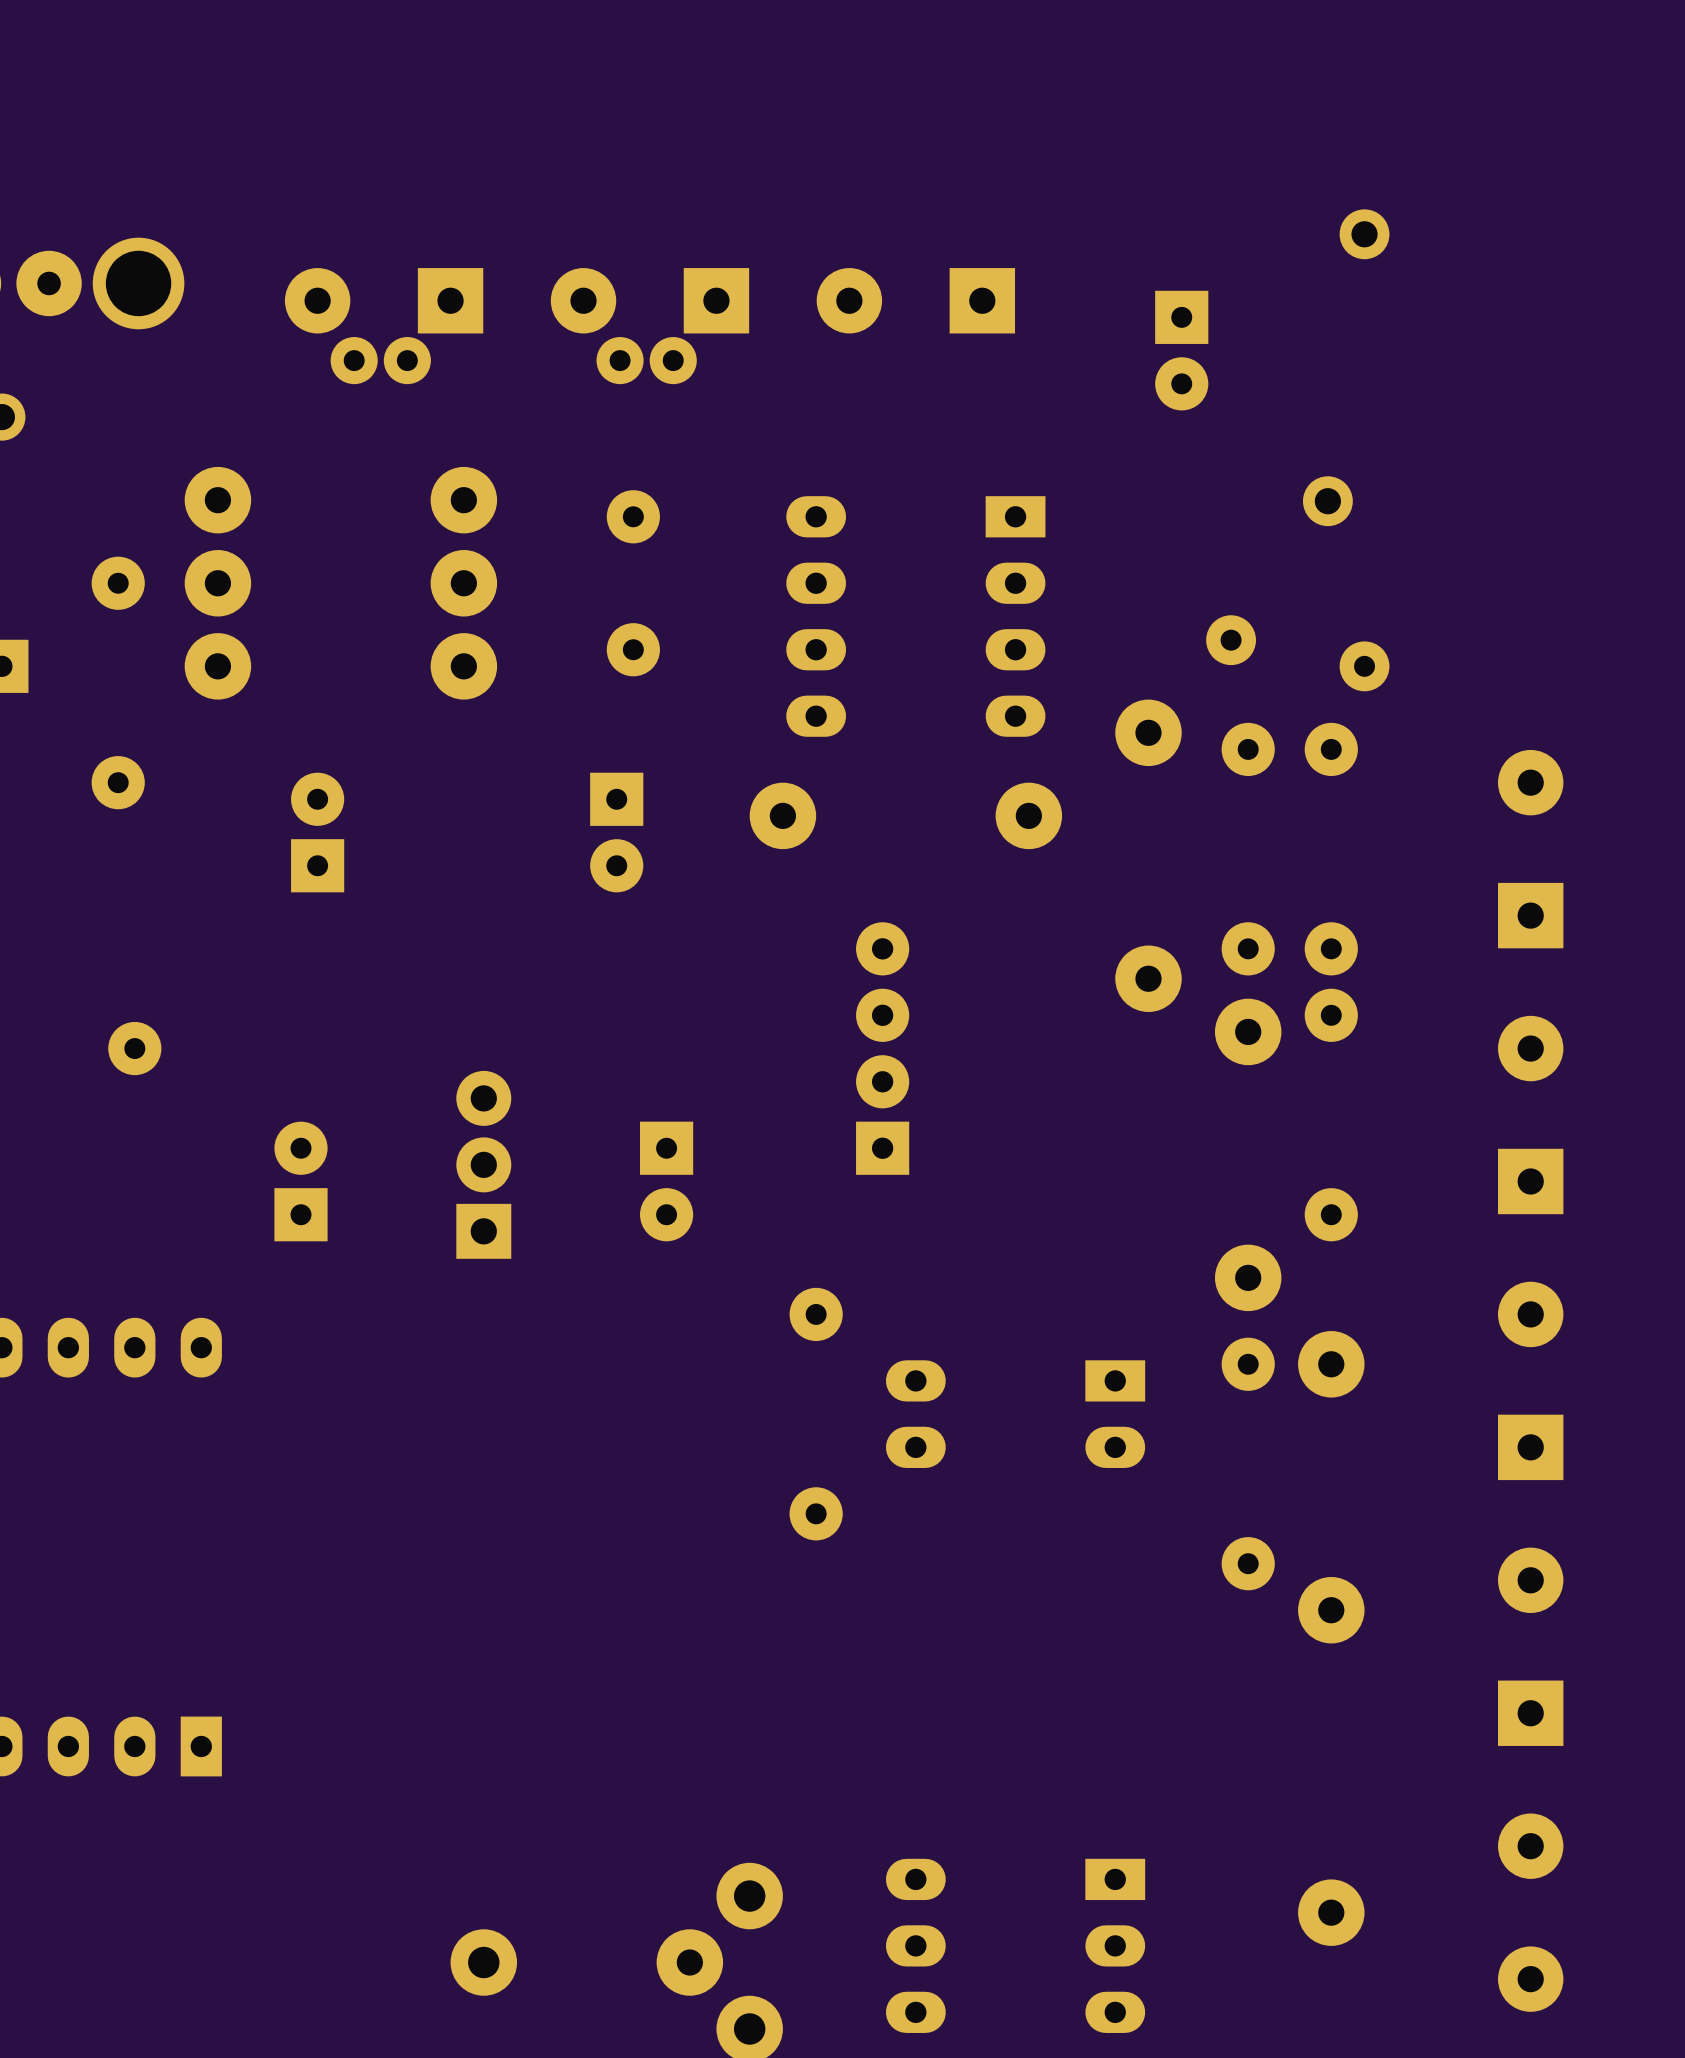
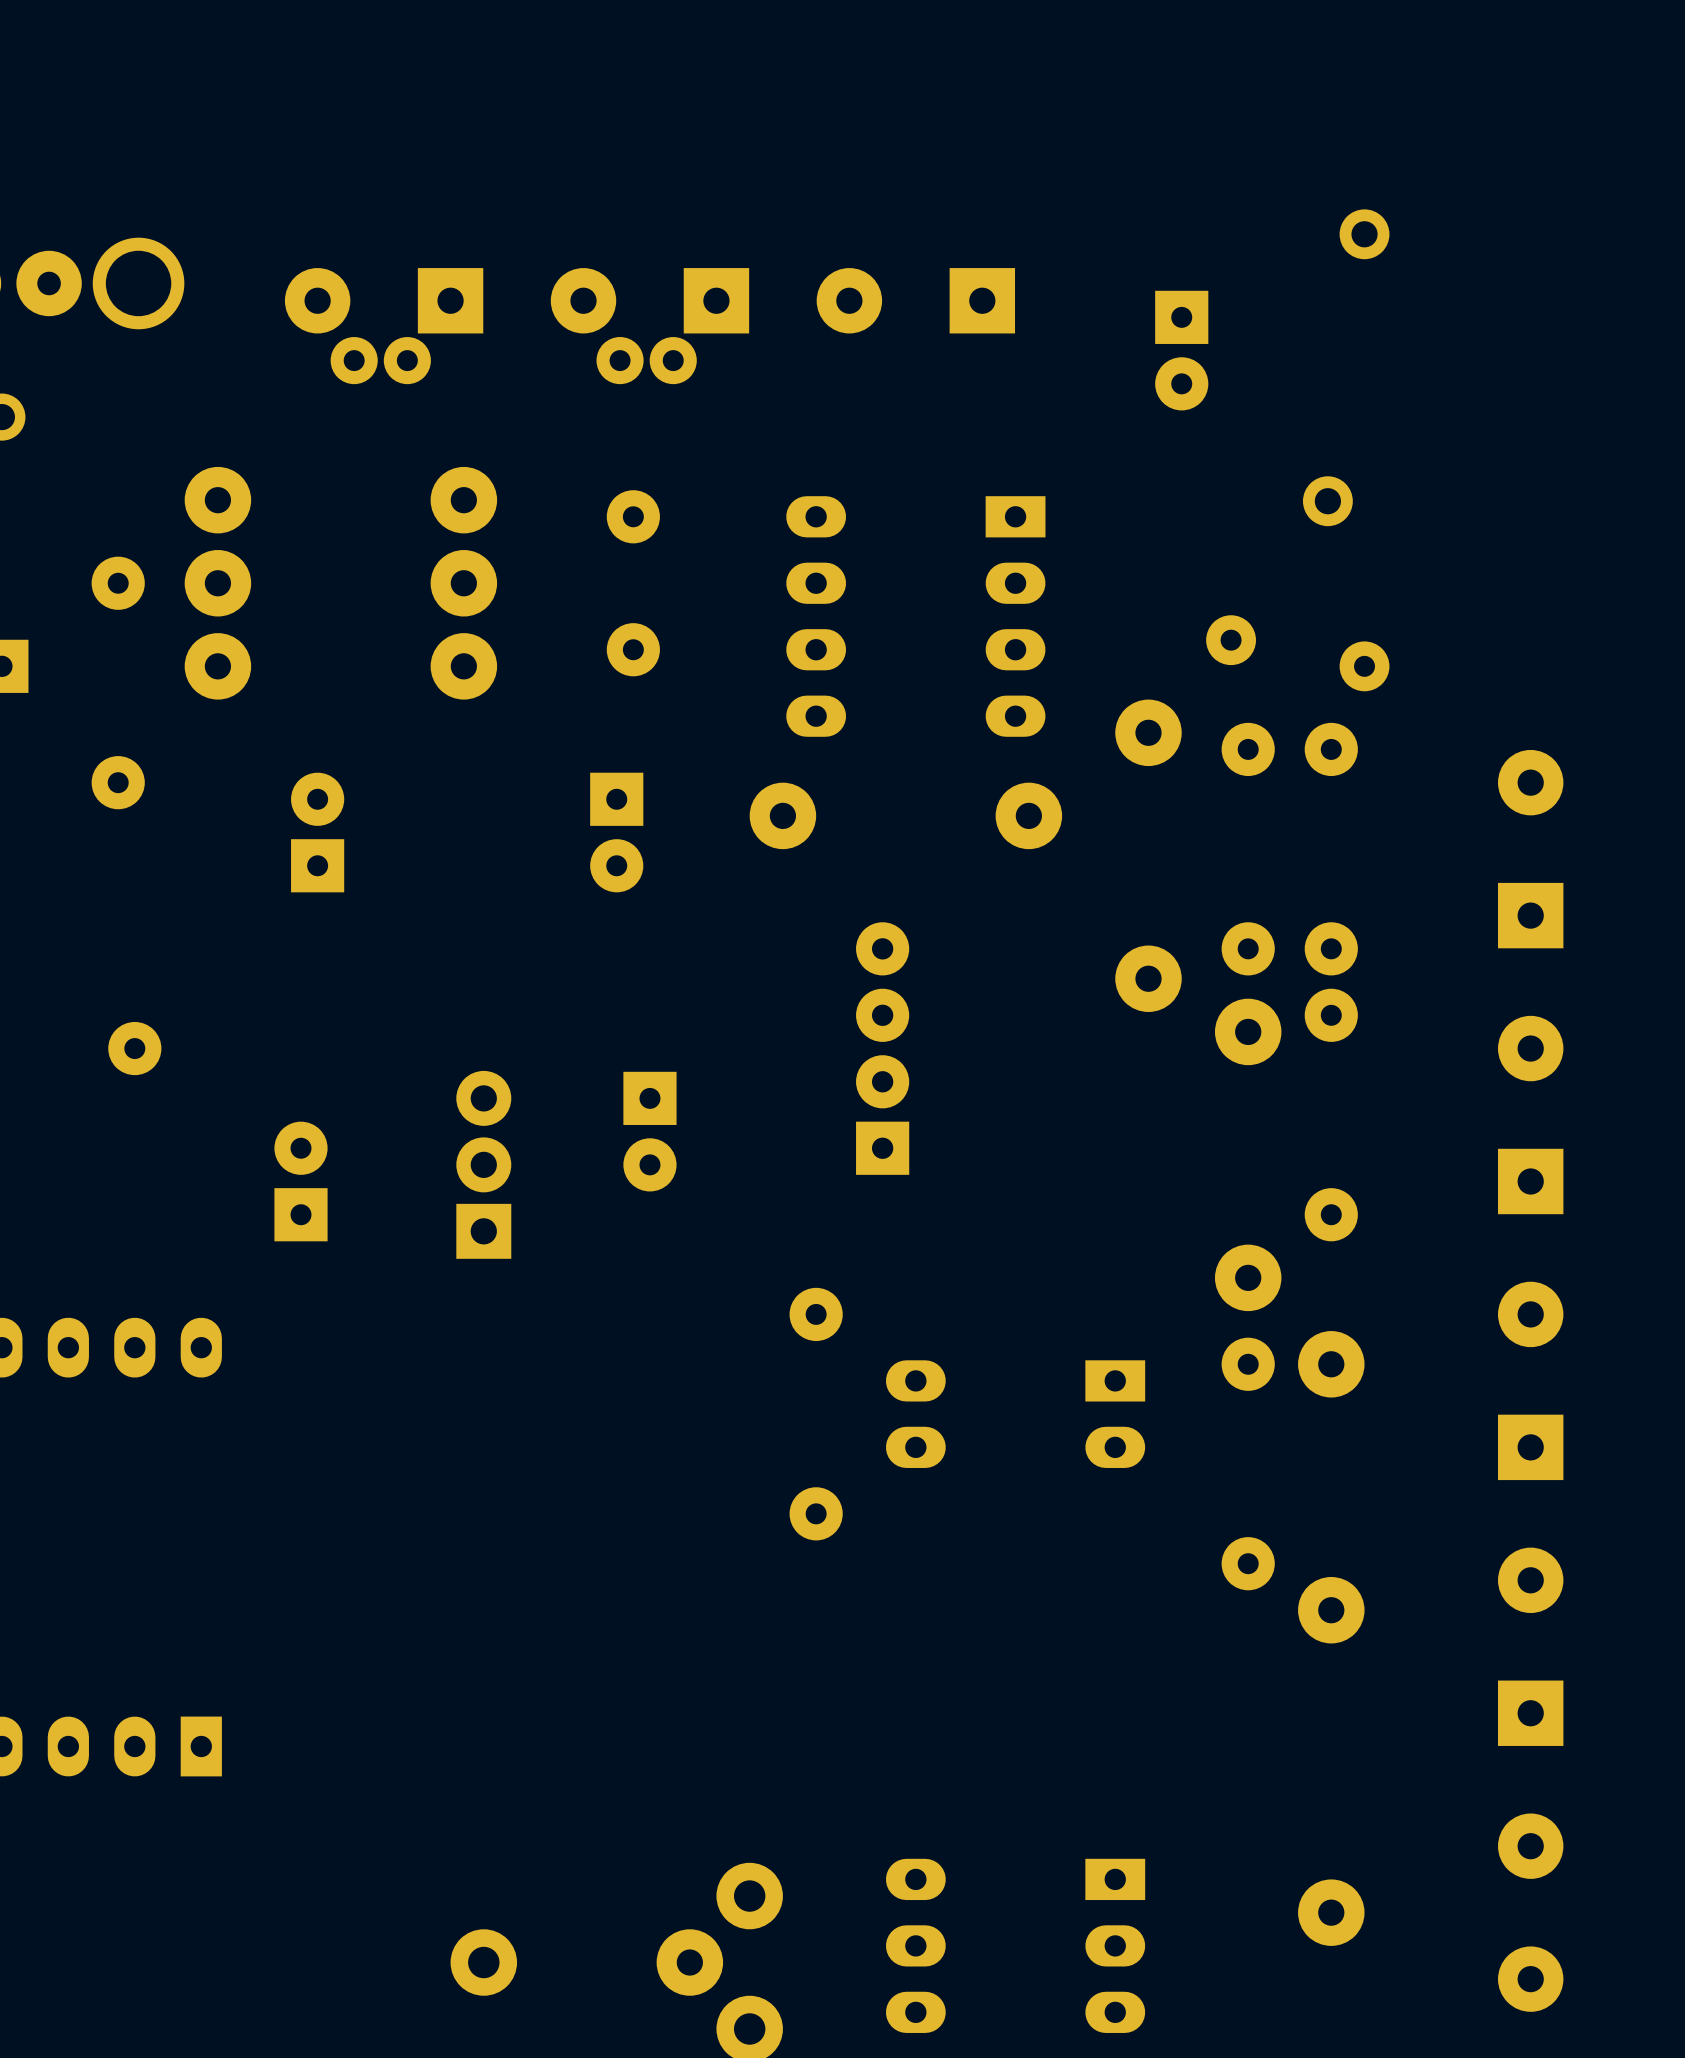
part position: (666, 1181) -> (649, 1131)

